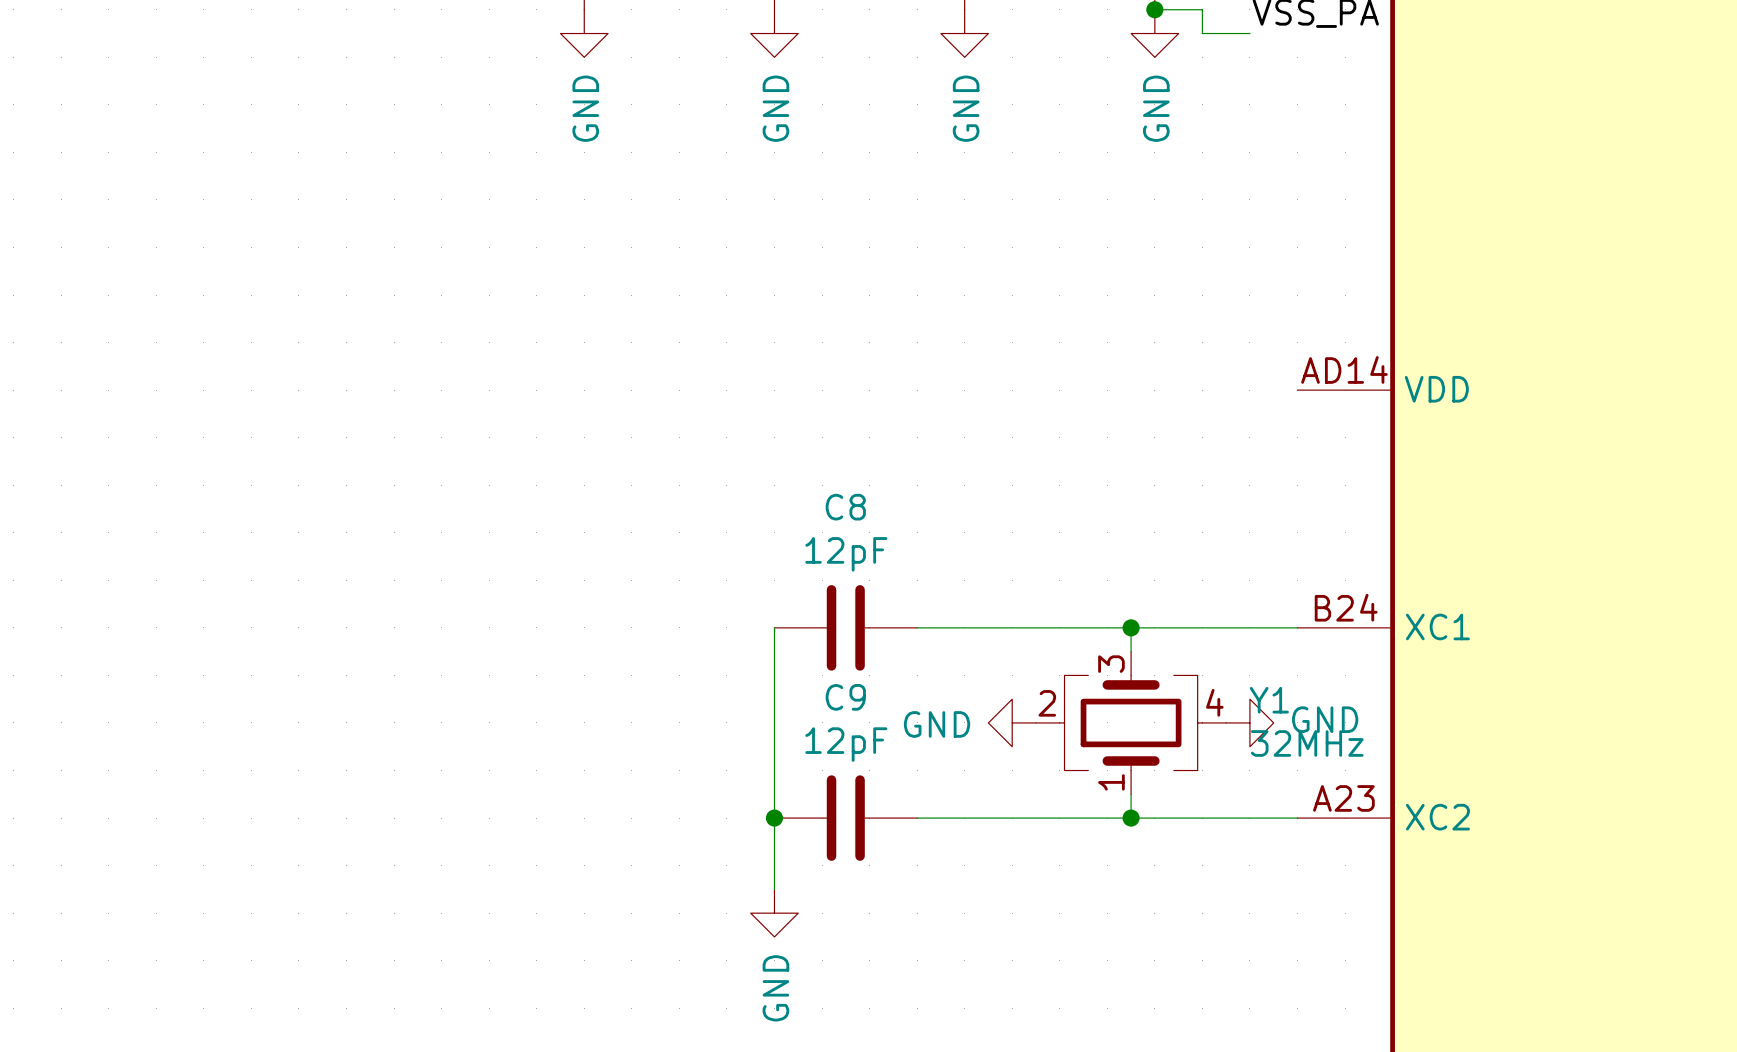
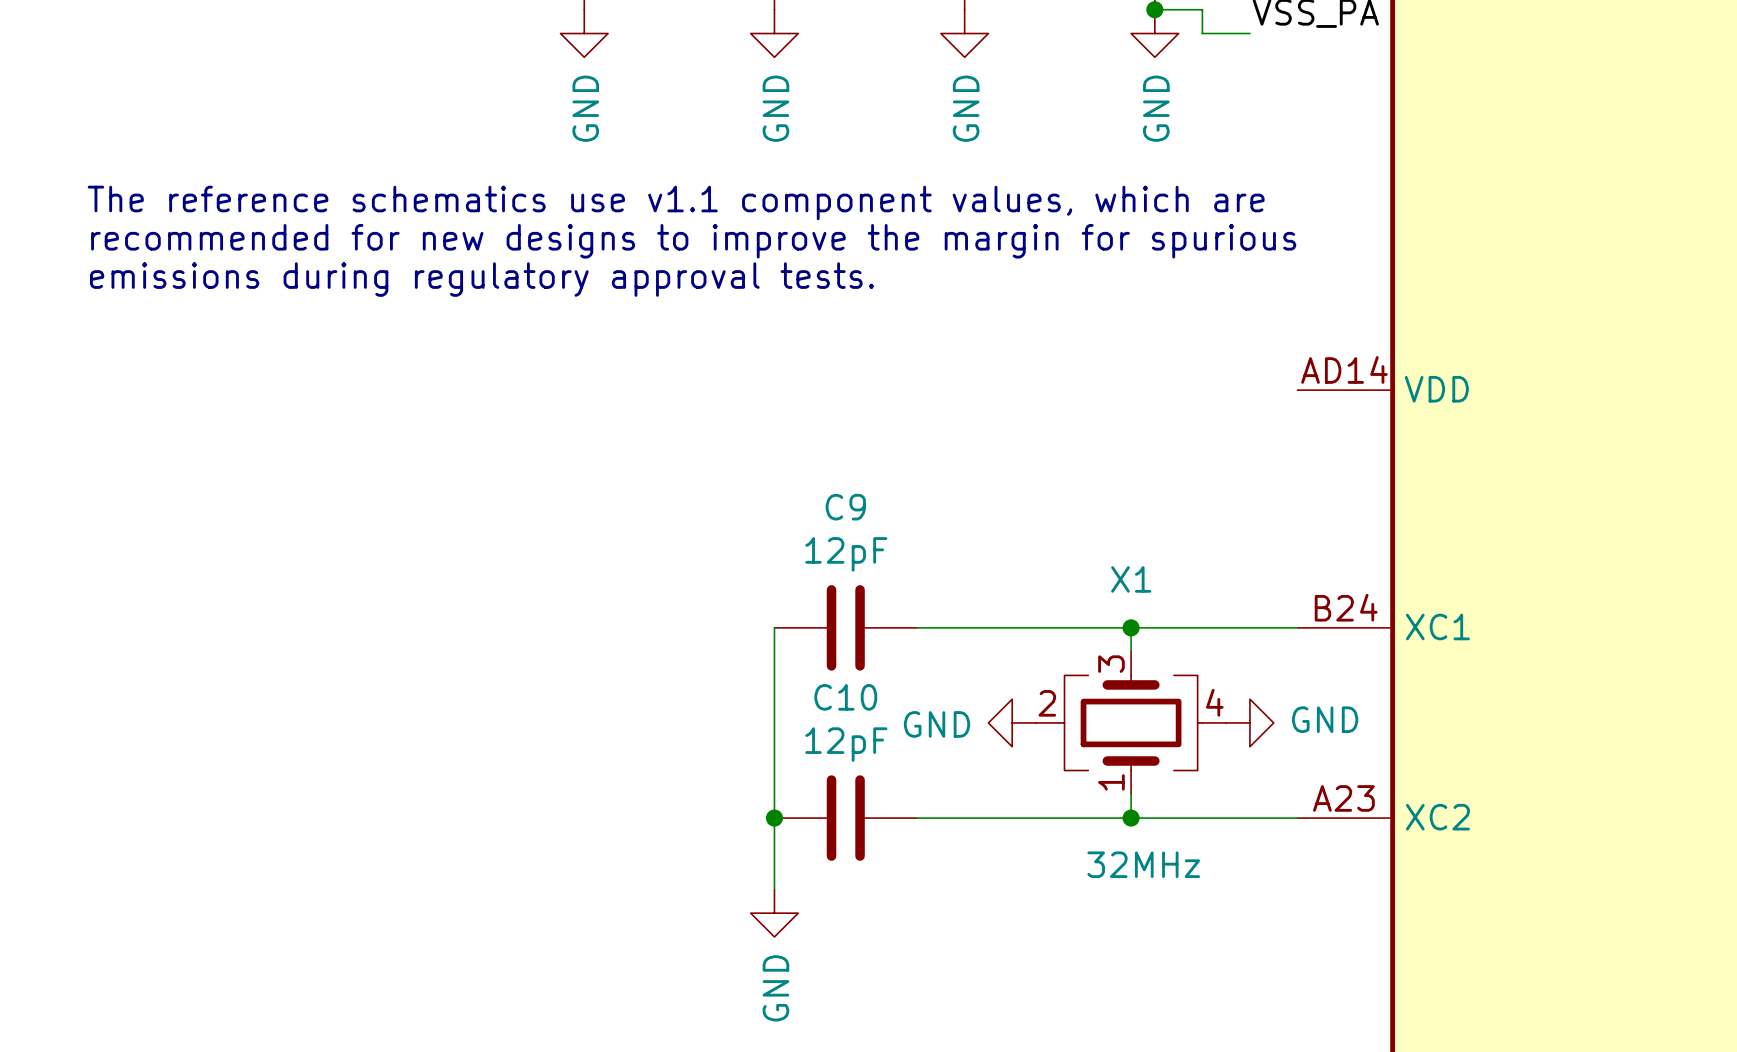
text: none -> The reference schematics use v1.1 component values, which are (676, 202)
text: none -> recommended for new designs to improve the margin for spurious (693, 241)
text: none -> emissions during regulatory approval tests. (481, 279)
C8 name: C8 (845, 507) -> C9 (845, 507)
C9 name: C9 (845, 697) -> C10 (845, 697)
Y1 name: Y1 (1269, 700) -> X1 (1131, 579)
Y1 value position: 32MHz (1307, 743) -> 32MHz (1143, 864)

